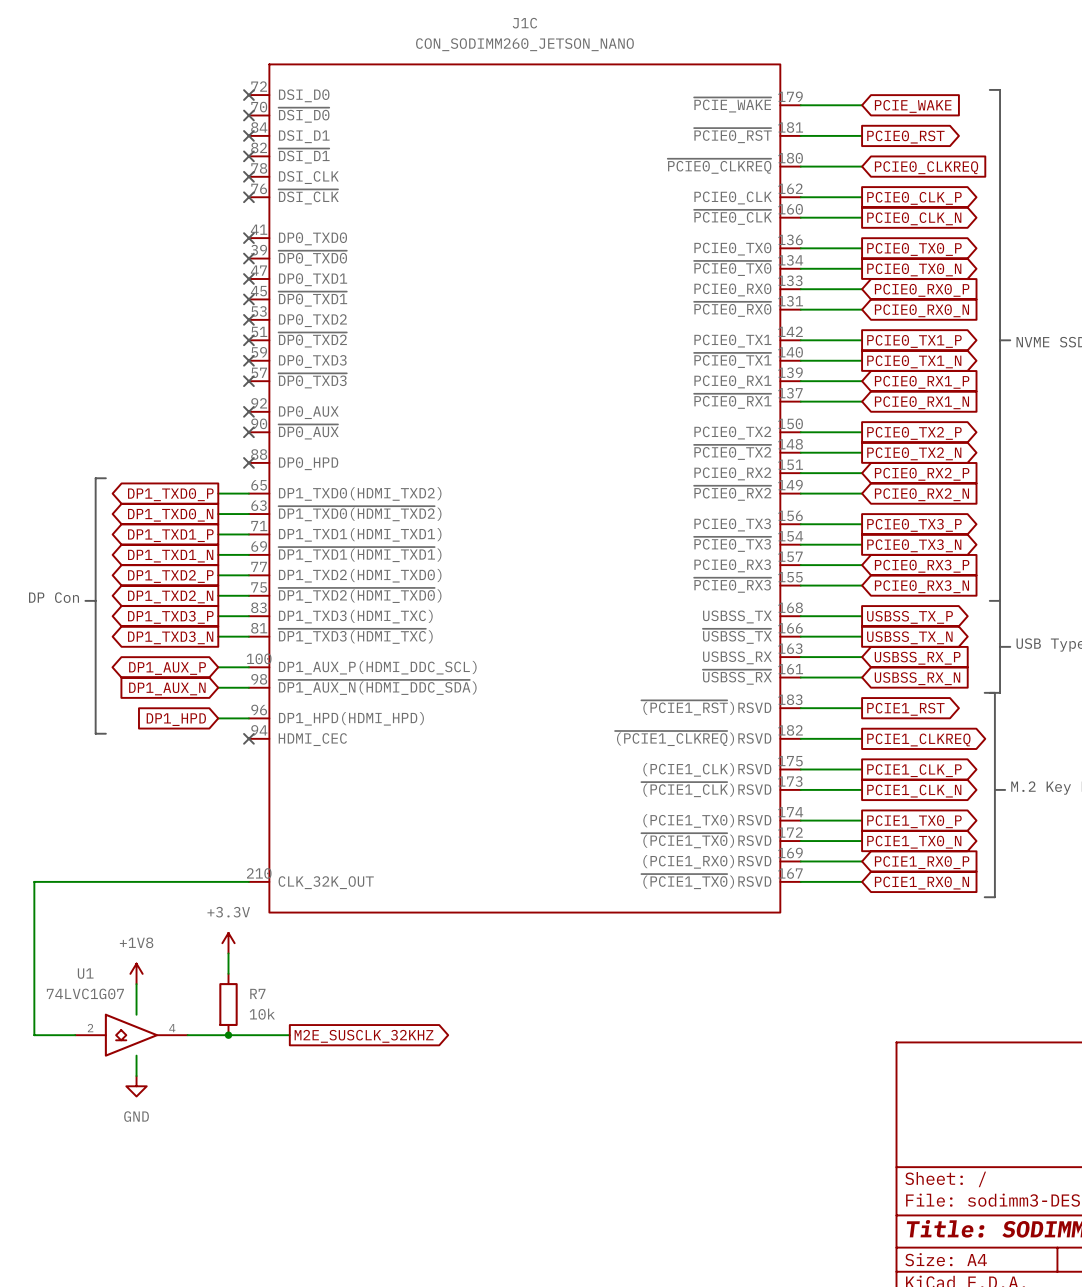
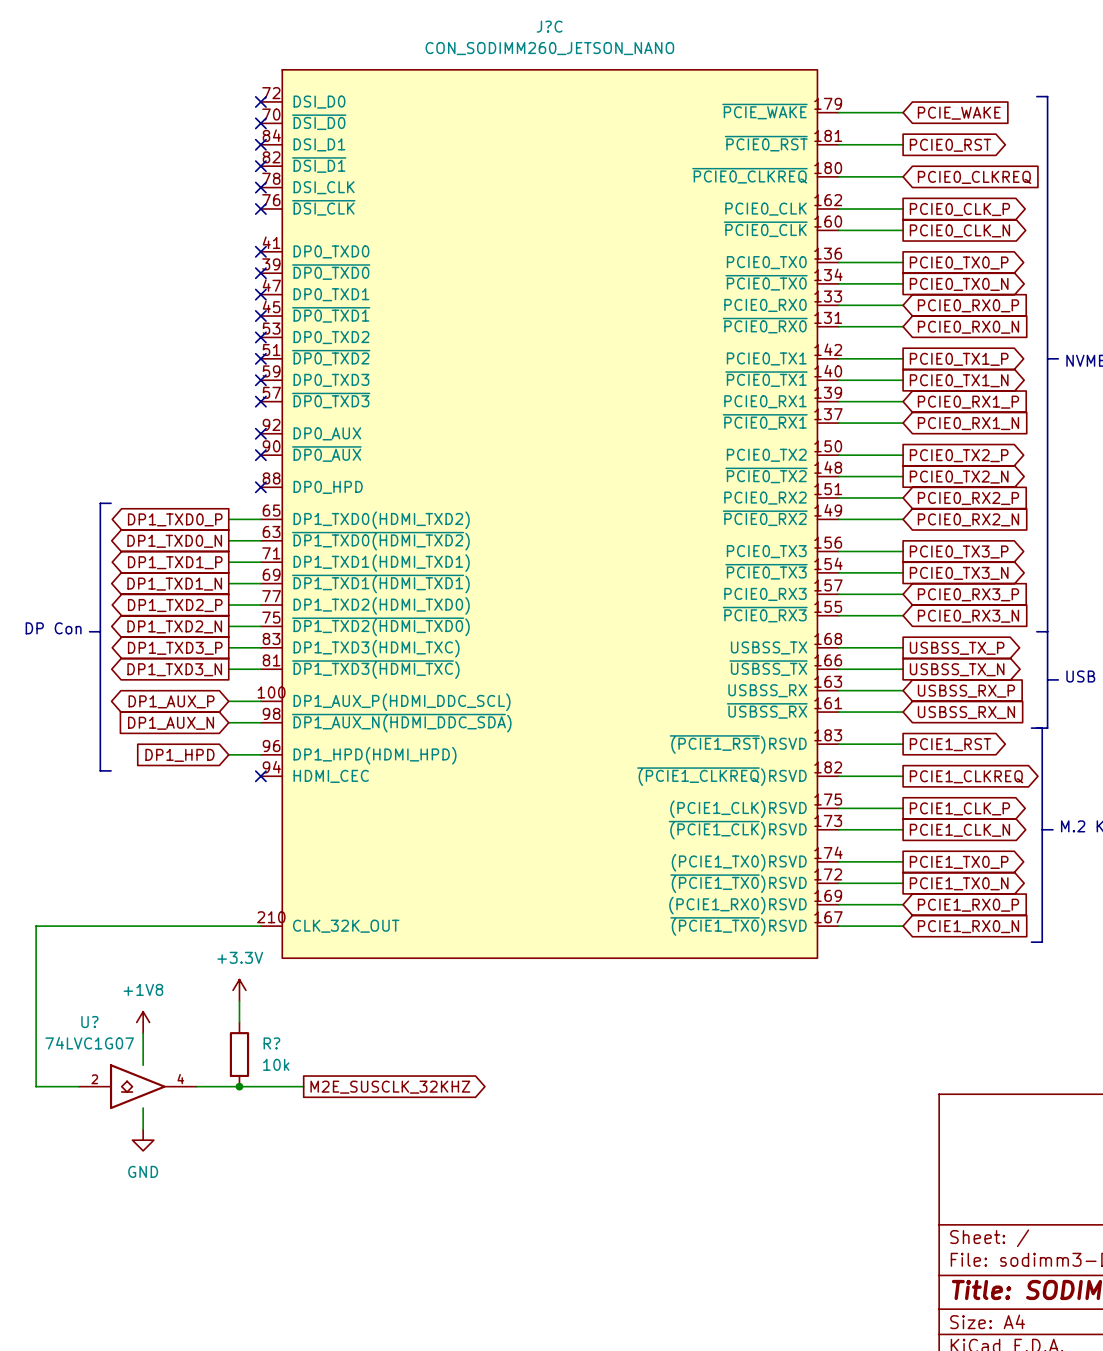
J1C name: J1C (524, 23) -> J?C (549, 26)
U1 name: U1 (85, 973) -> U? (89, 1022)
R7 name: R7 (257, 993) -> R? (271, 1043)

